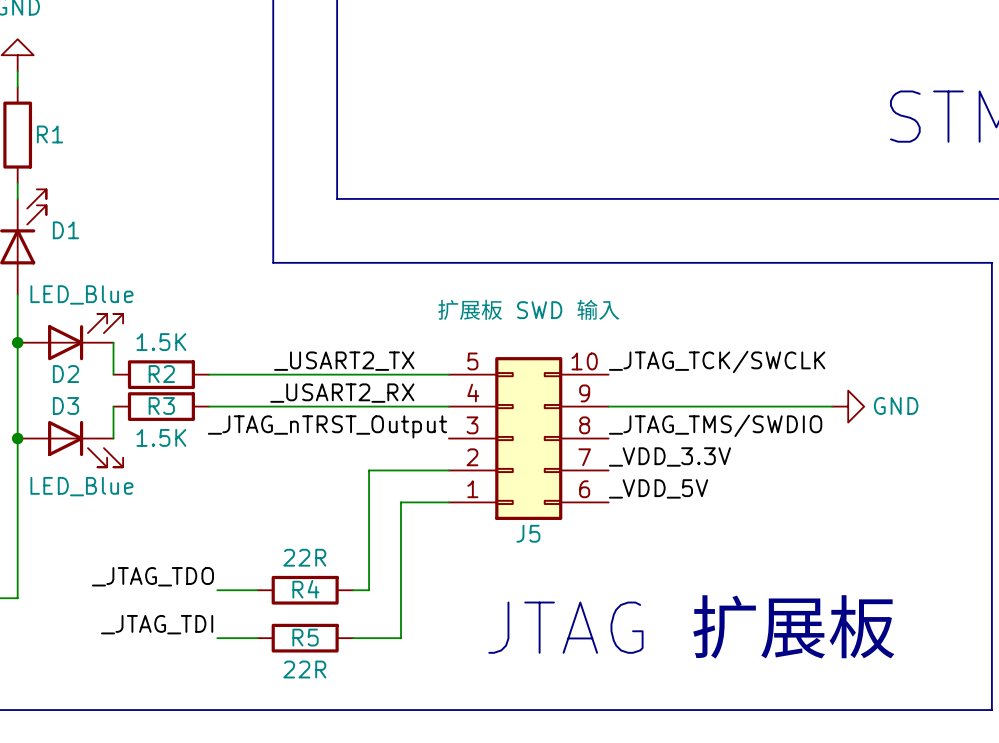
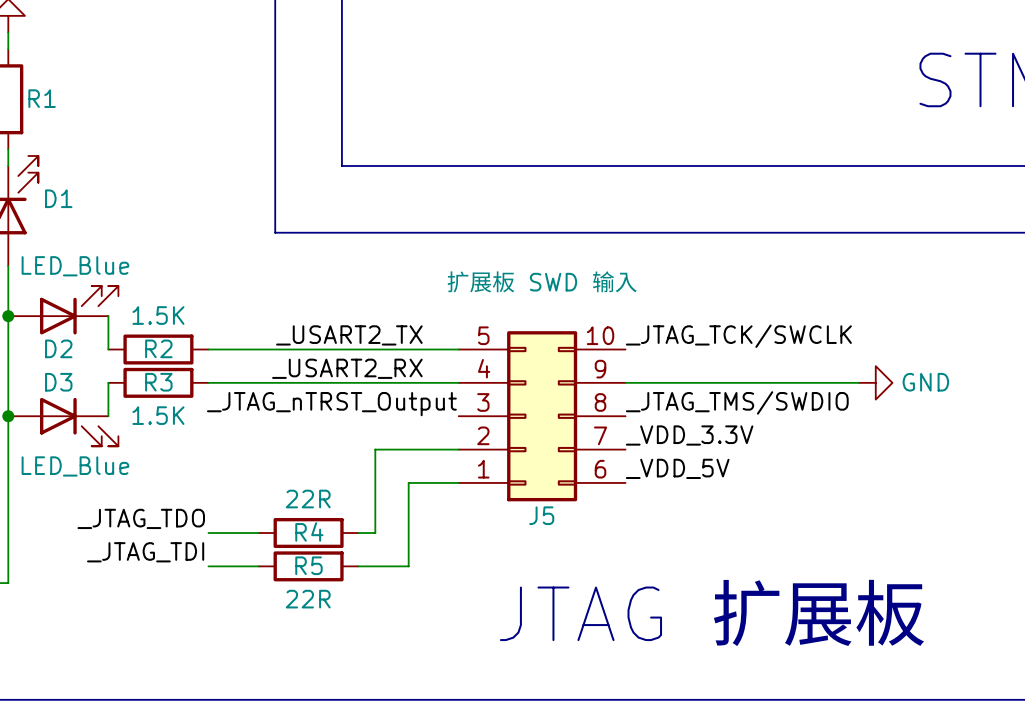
wire: none -> (208, 533) (258, 533)
wire: (369, 550) (369, 590) (353, 590) -> (375, 533) (358, 533)
label position: _JTAG_TDO (152, 576) -> _JTAG_TDO (141, 518)
wire: none -> (208, 566) (258, 566)
wire: (400, 582) (400, 638) (353, 638) -> (408, 566) (358, 566)
wire: (217, 590) (257, 590) -> none
R4 position: (305, 590) -> (308, 533)
label position: _JTAG_TDI (157, 624) -> _JTAG_TDI (145, 552)
wire: (217, 638) (257, 638) -> none
R5 position: (305, 638) -> (308, 566)

